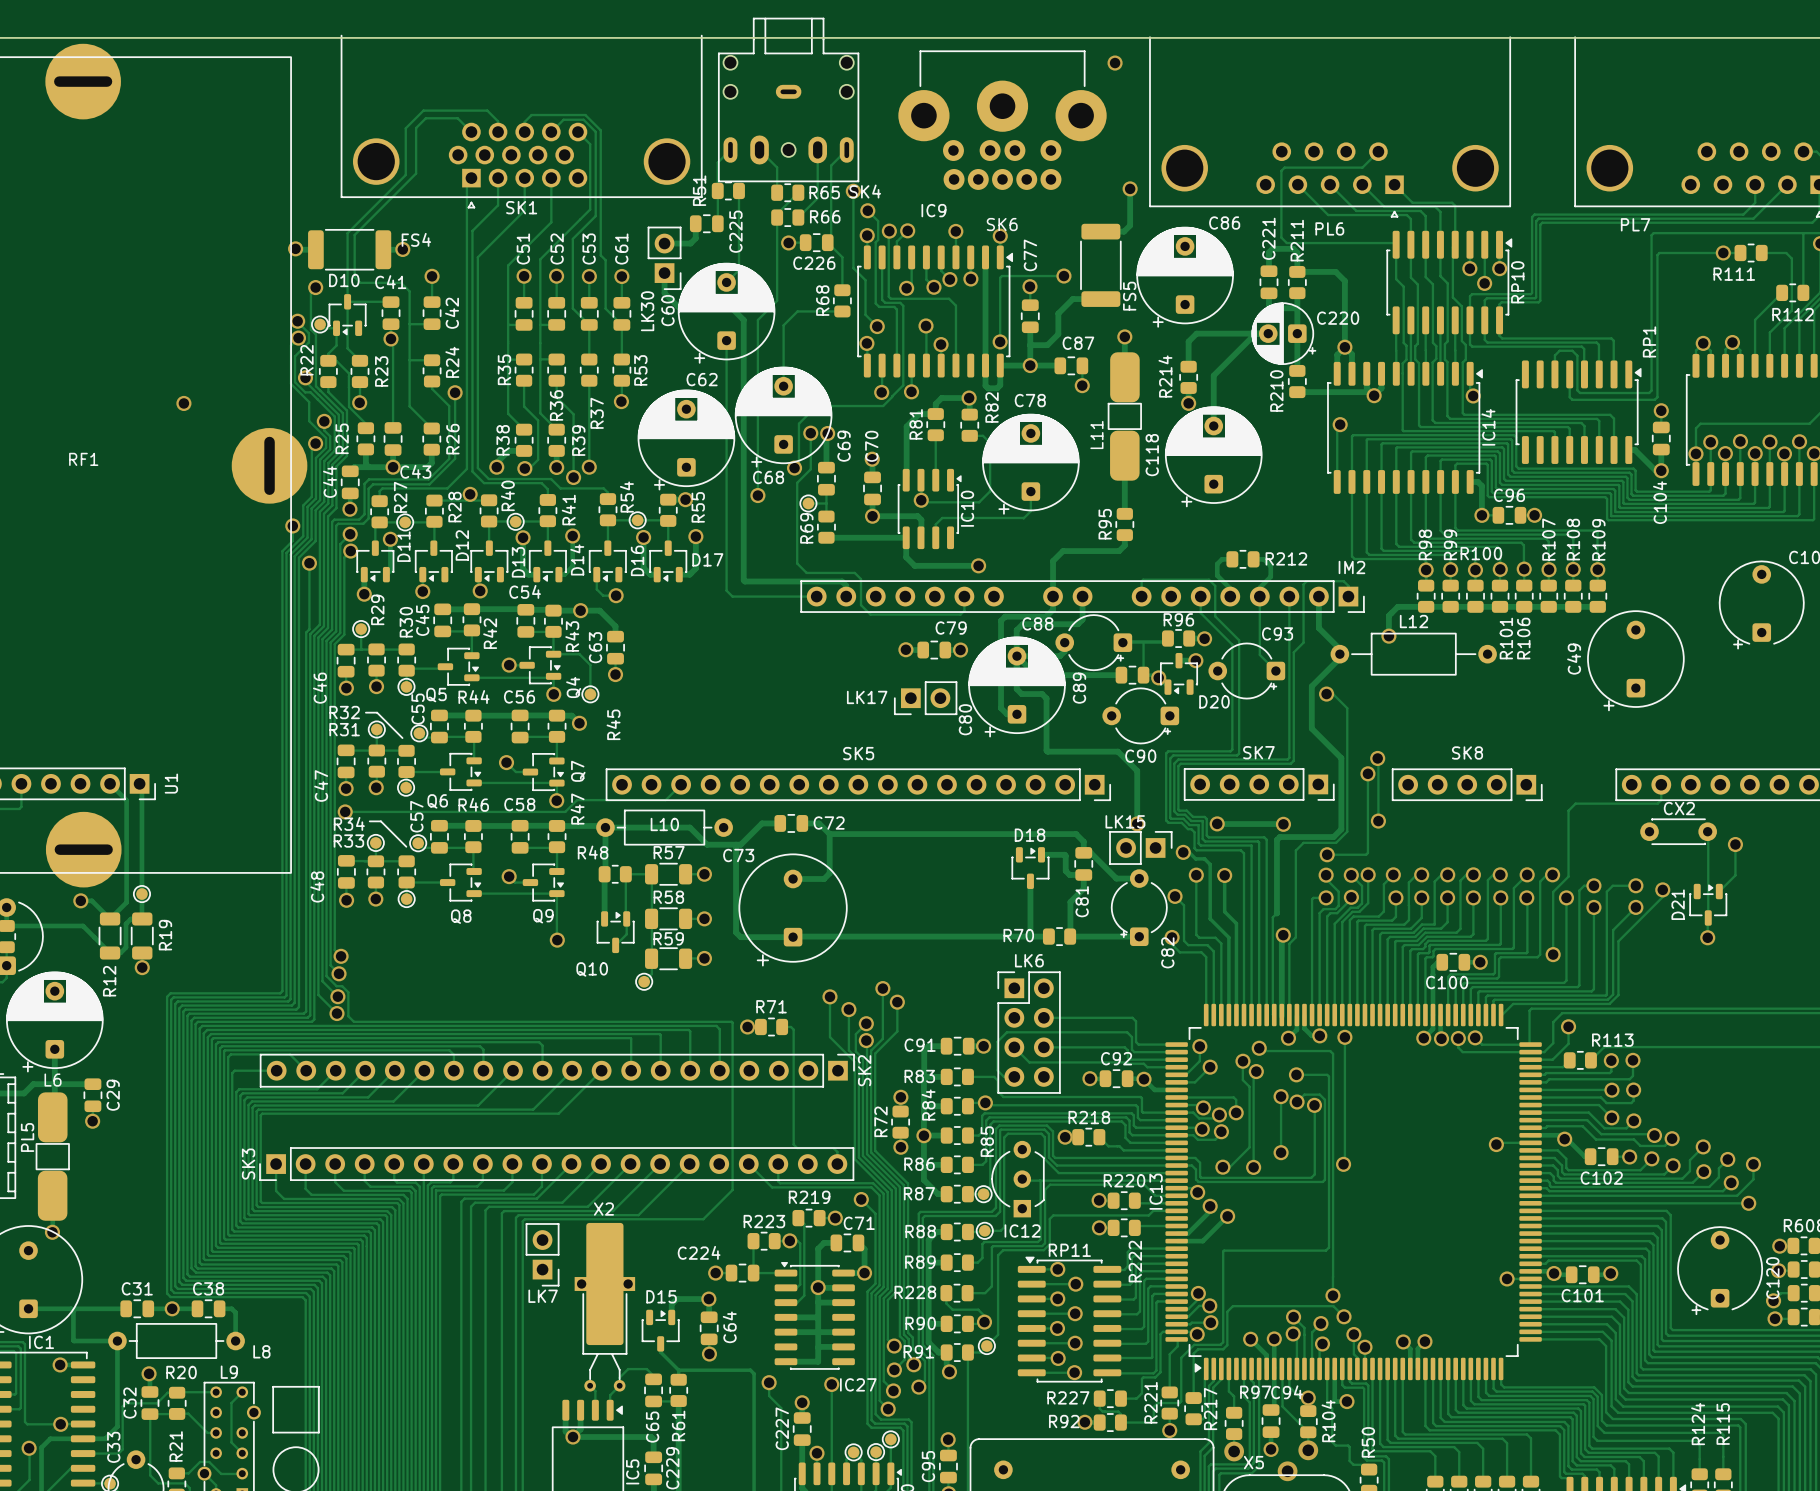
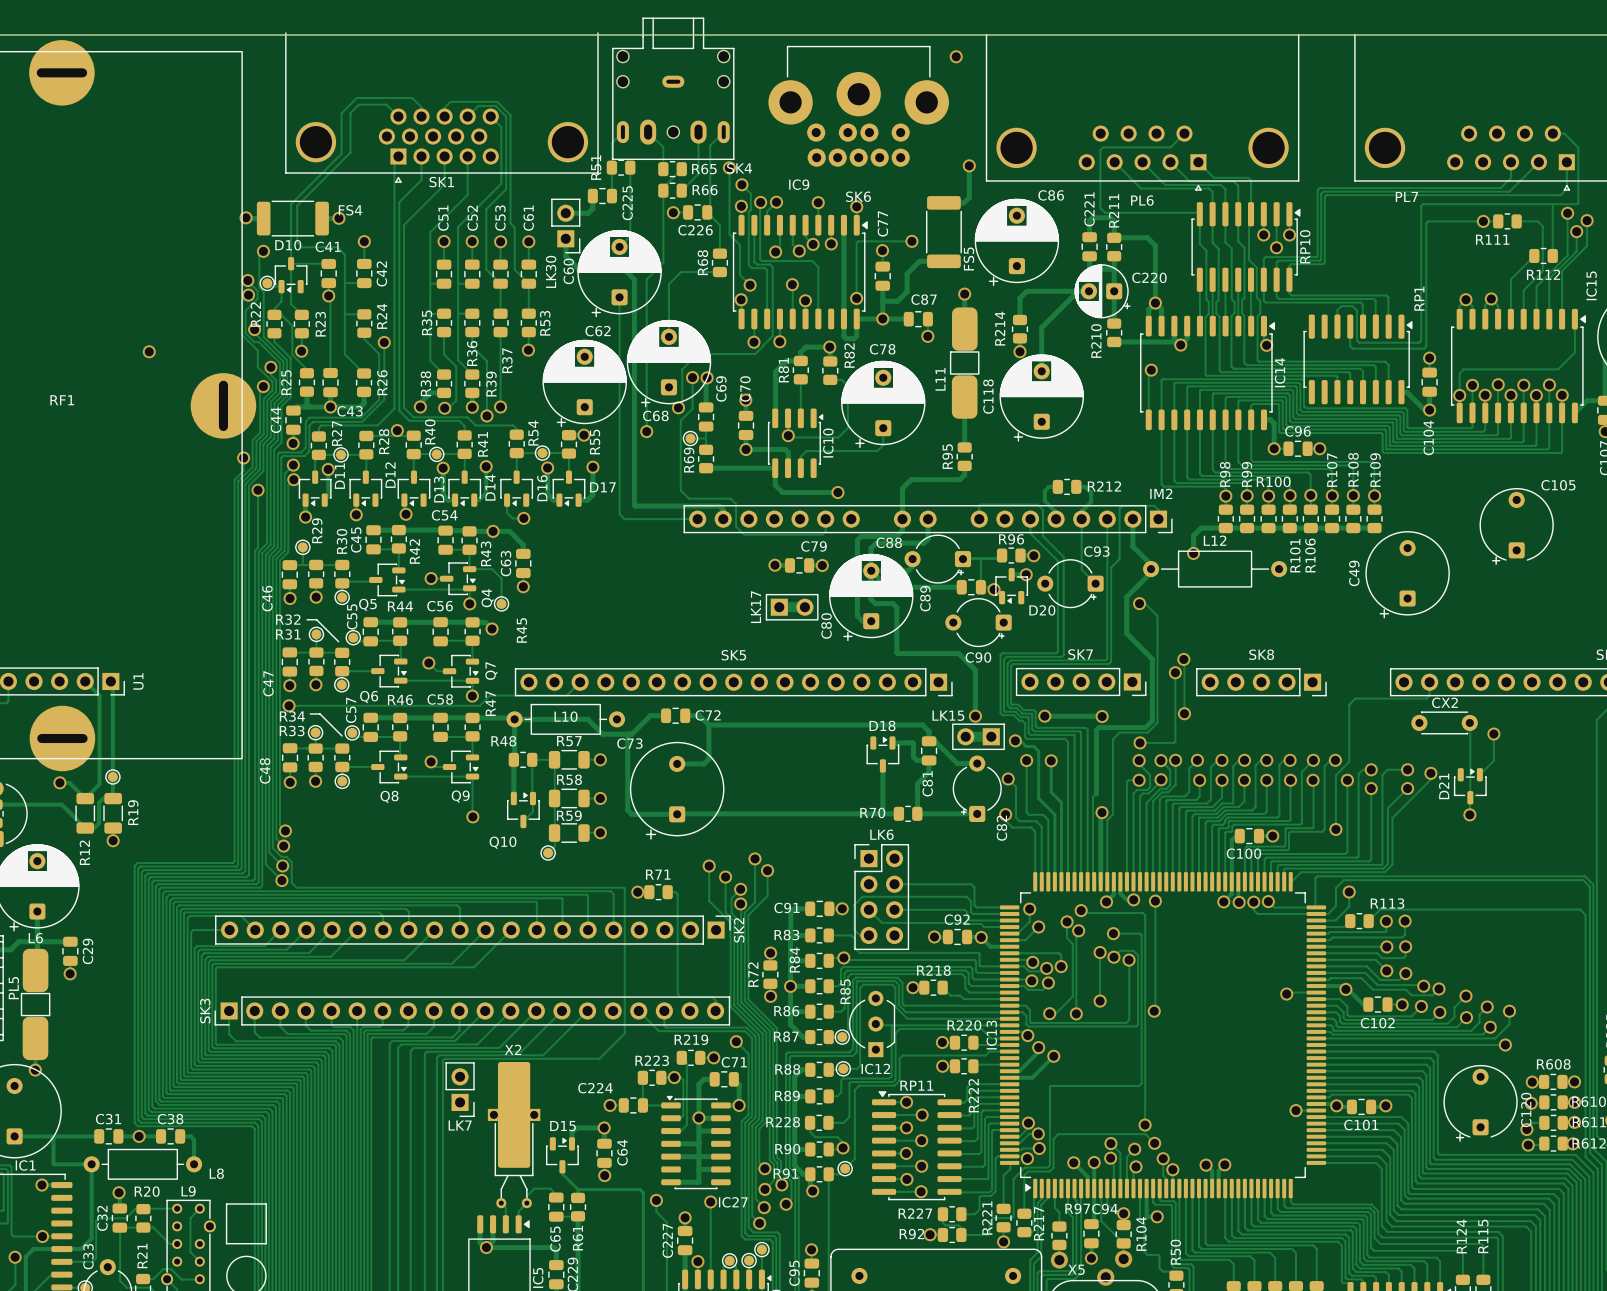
LK17 footprint: [894, 681, 958, 715] -> [765, 594, 819, 621]
LK15 footprint: [1109, 831, 1173, 865] -> [952, 723, 1005, 750]

